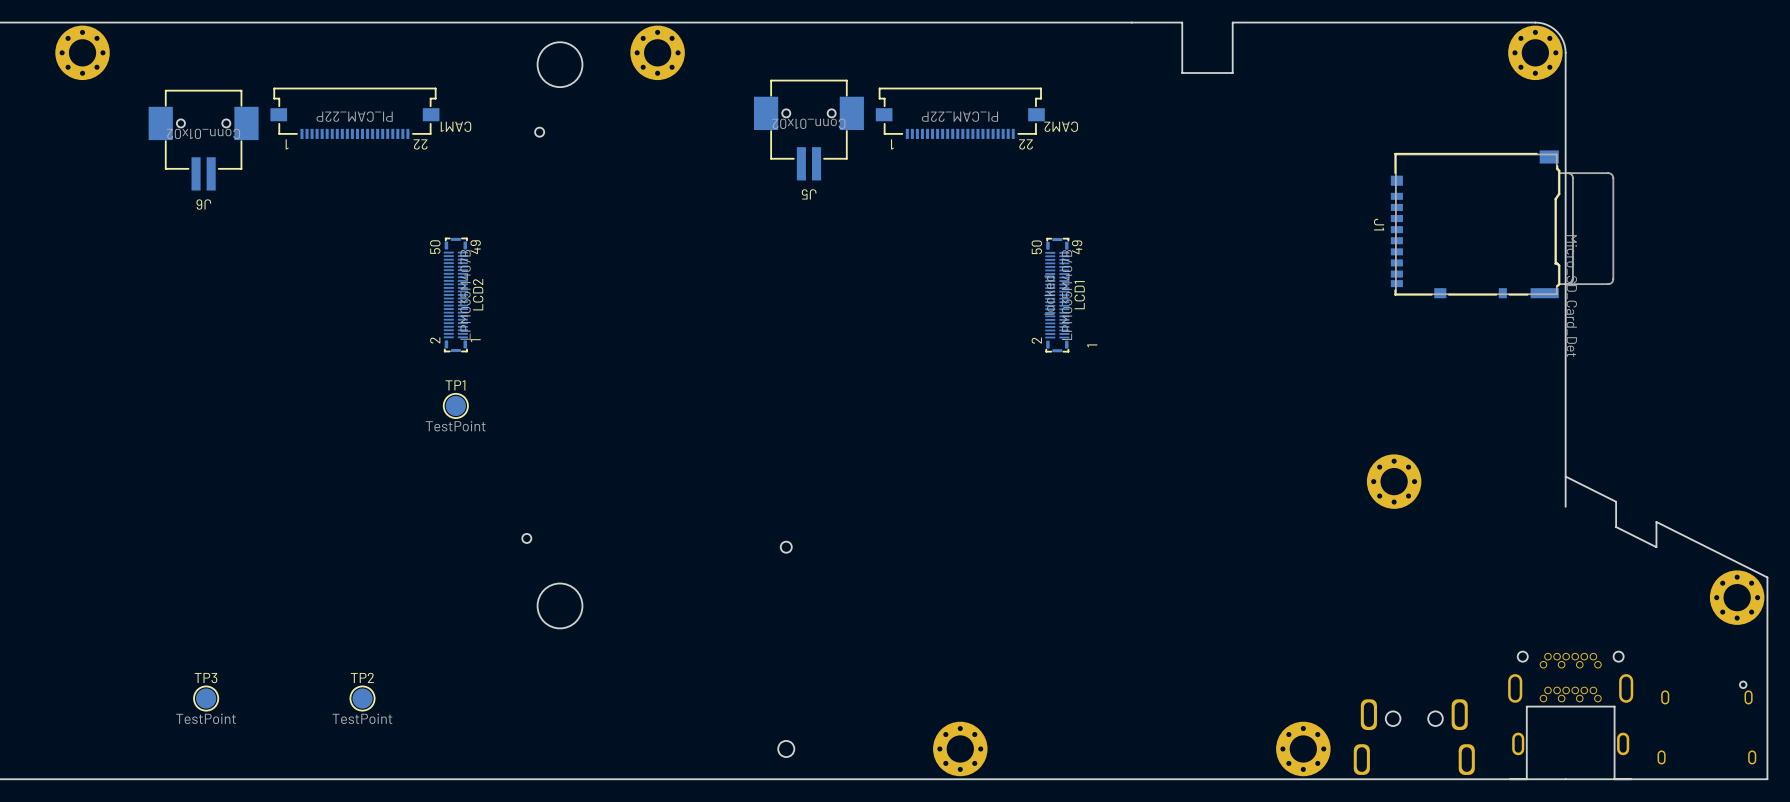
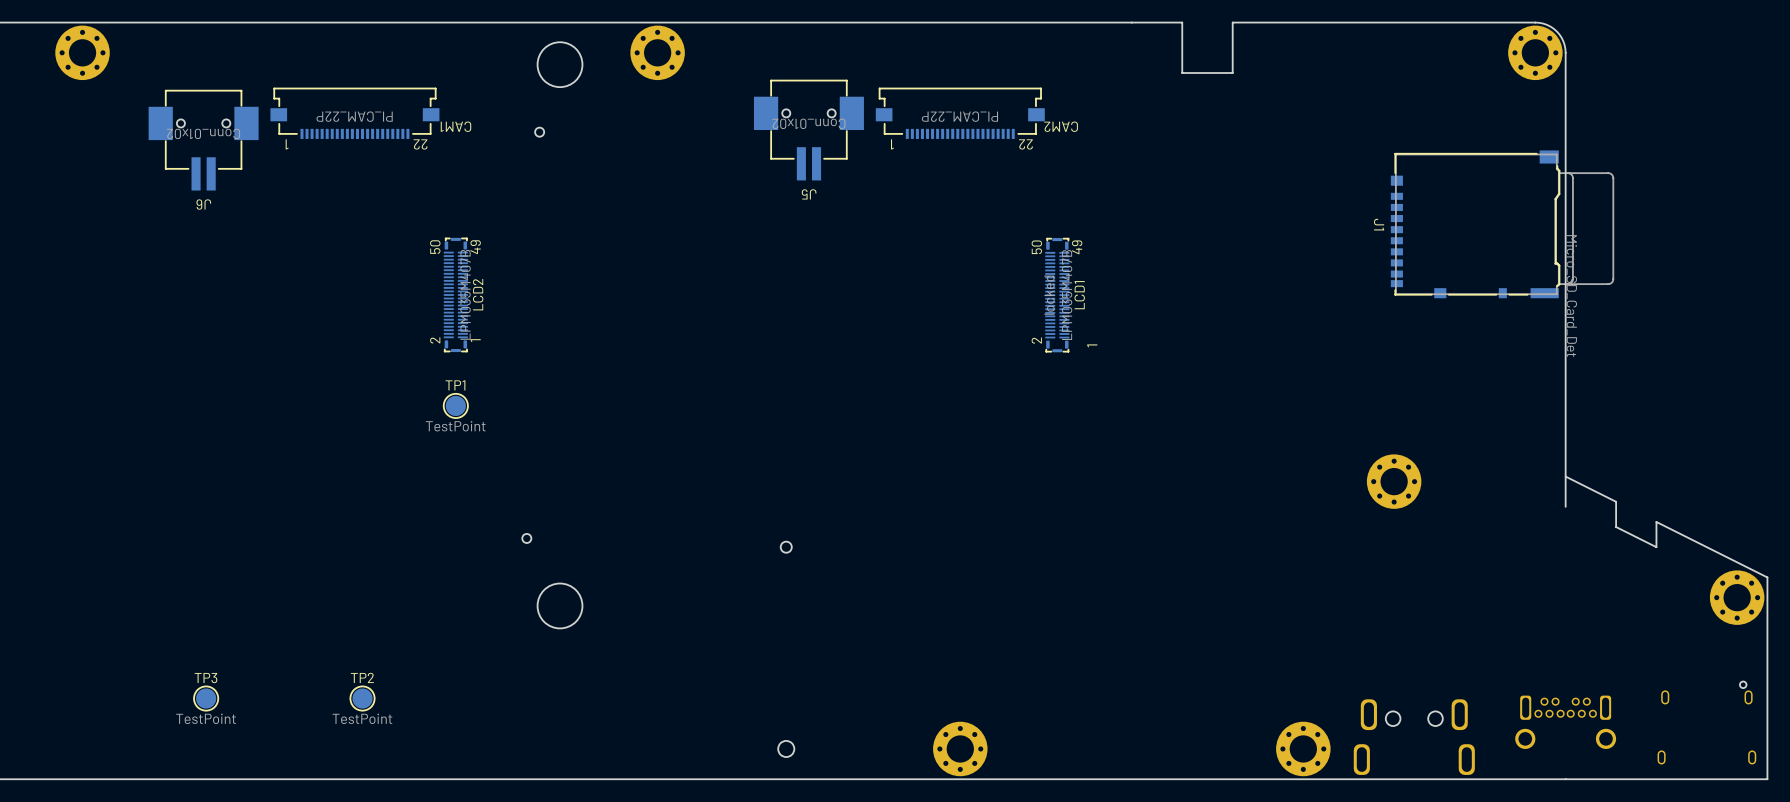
part footprint: [1508, 651, 1634, 780] -> [1515, 695, 1617, 749]

